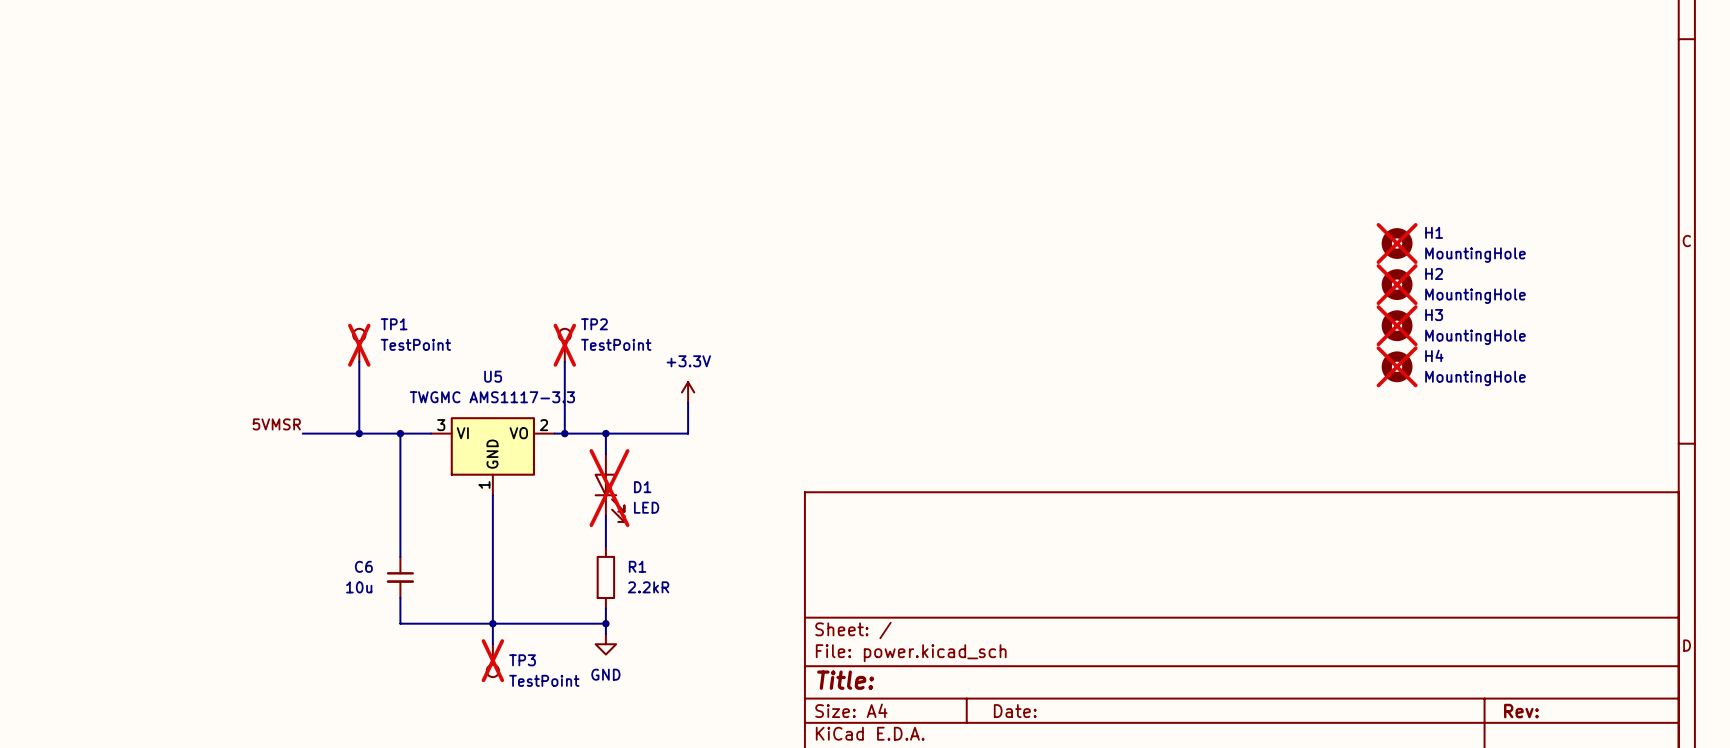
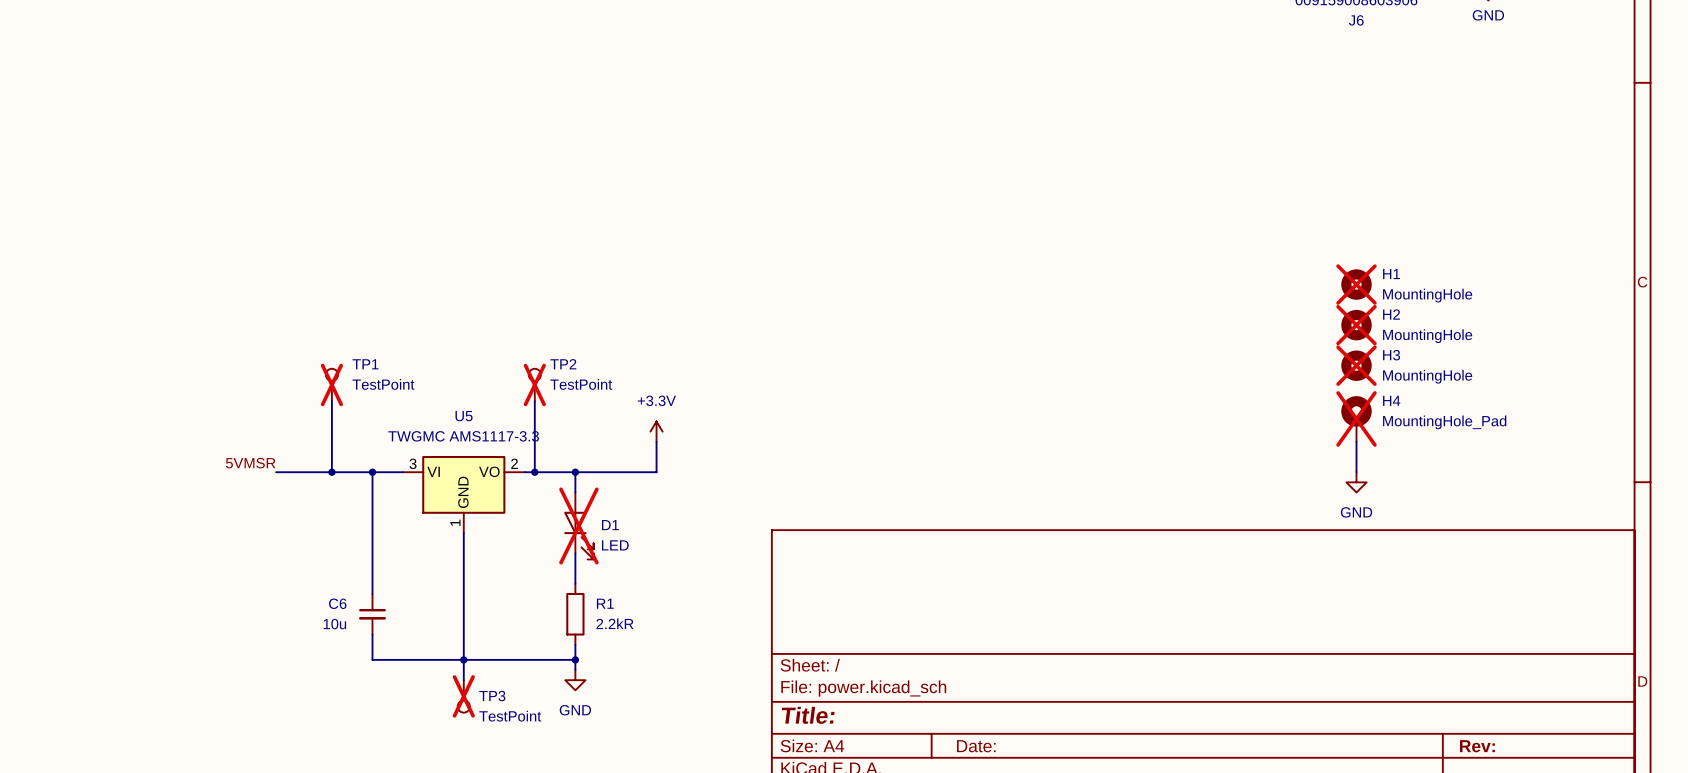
H4 symbol: [1381, 351, 1413, 383] -> [1341, 396, 1372, 442]
H4 value: MountingHole (1475, 378) -> MountingHole_Pad (1444, 422)
wire: none -> (1356, 441) (1356, 472)
power symbol: none -> GND (1356, 482)

